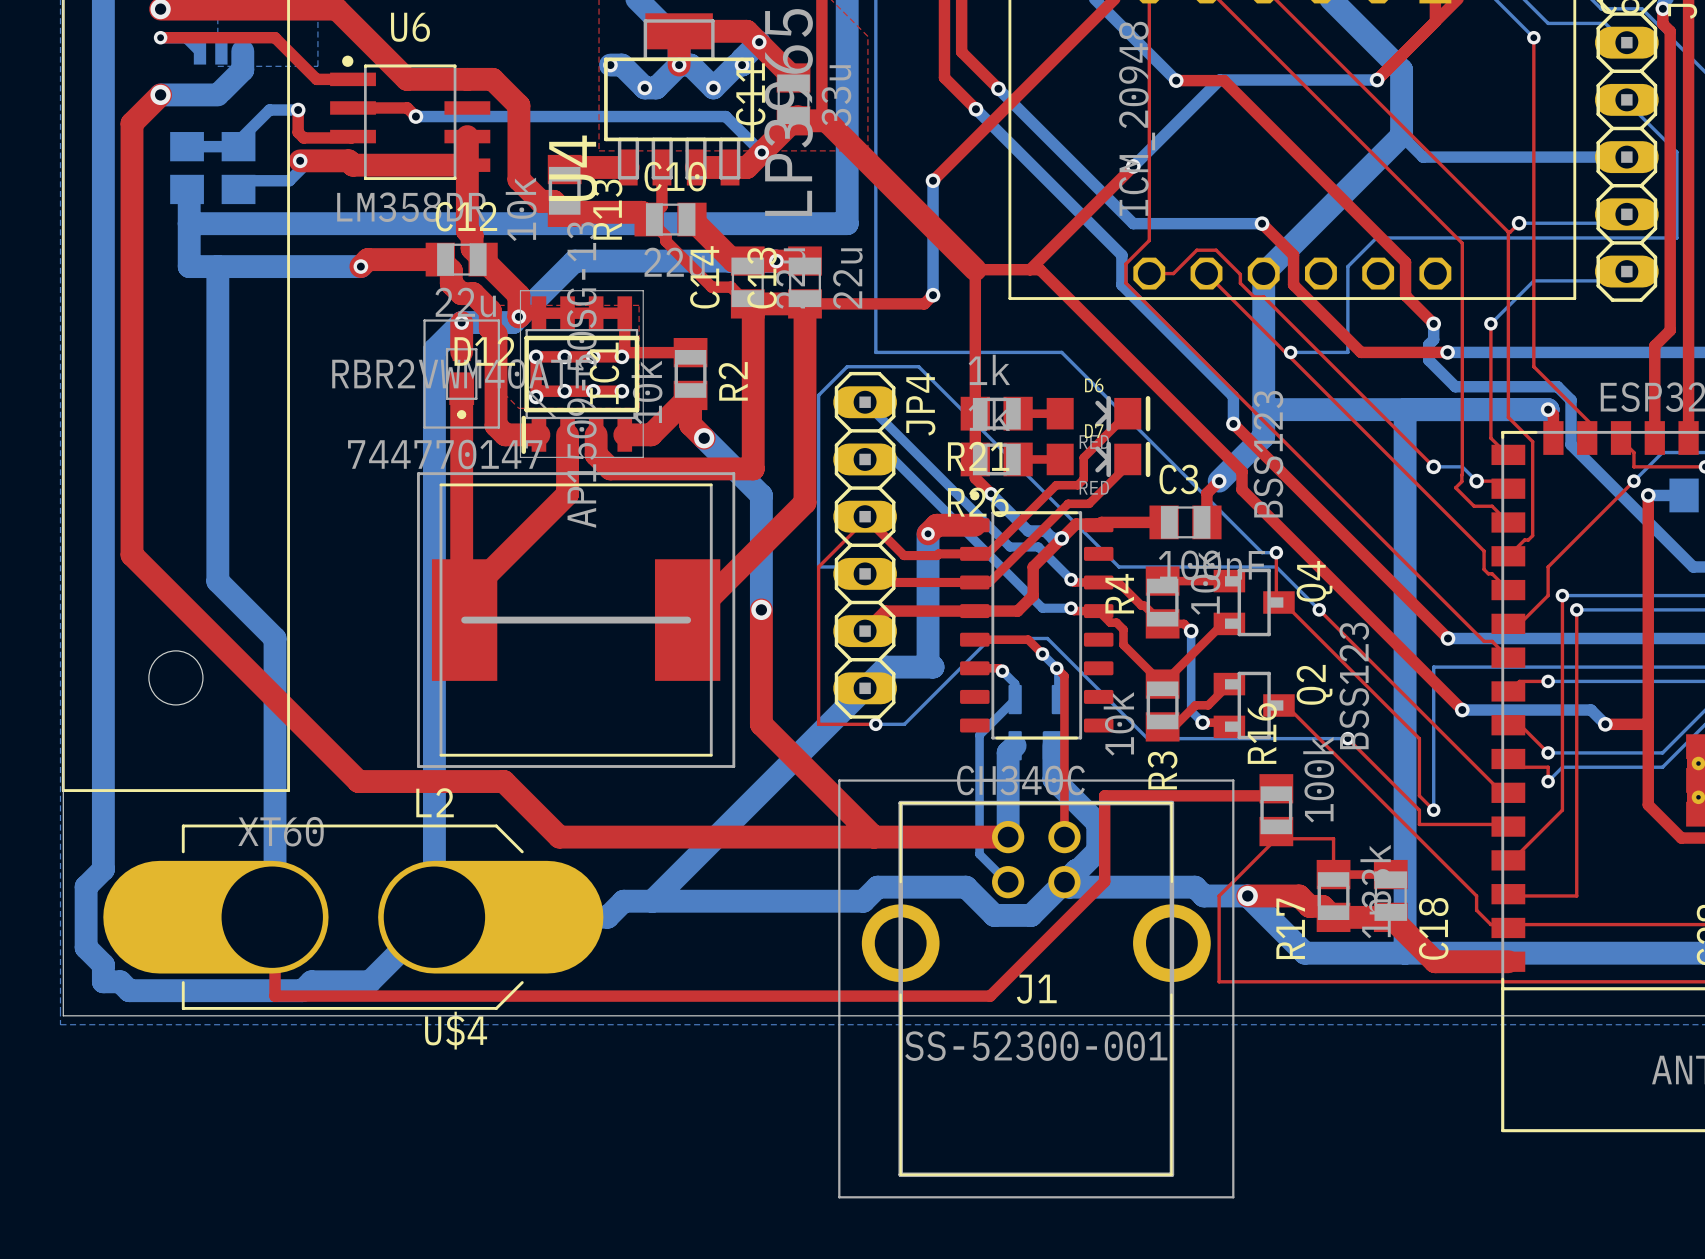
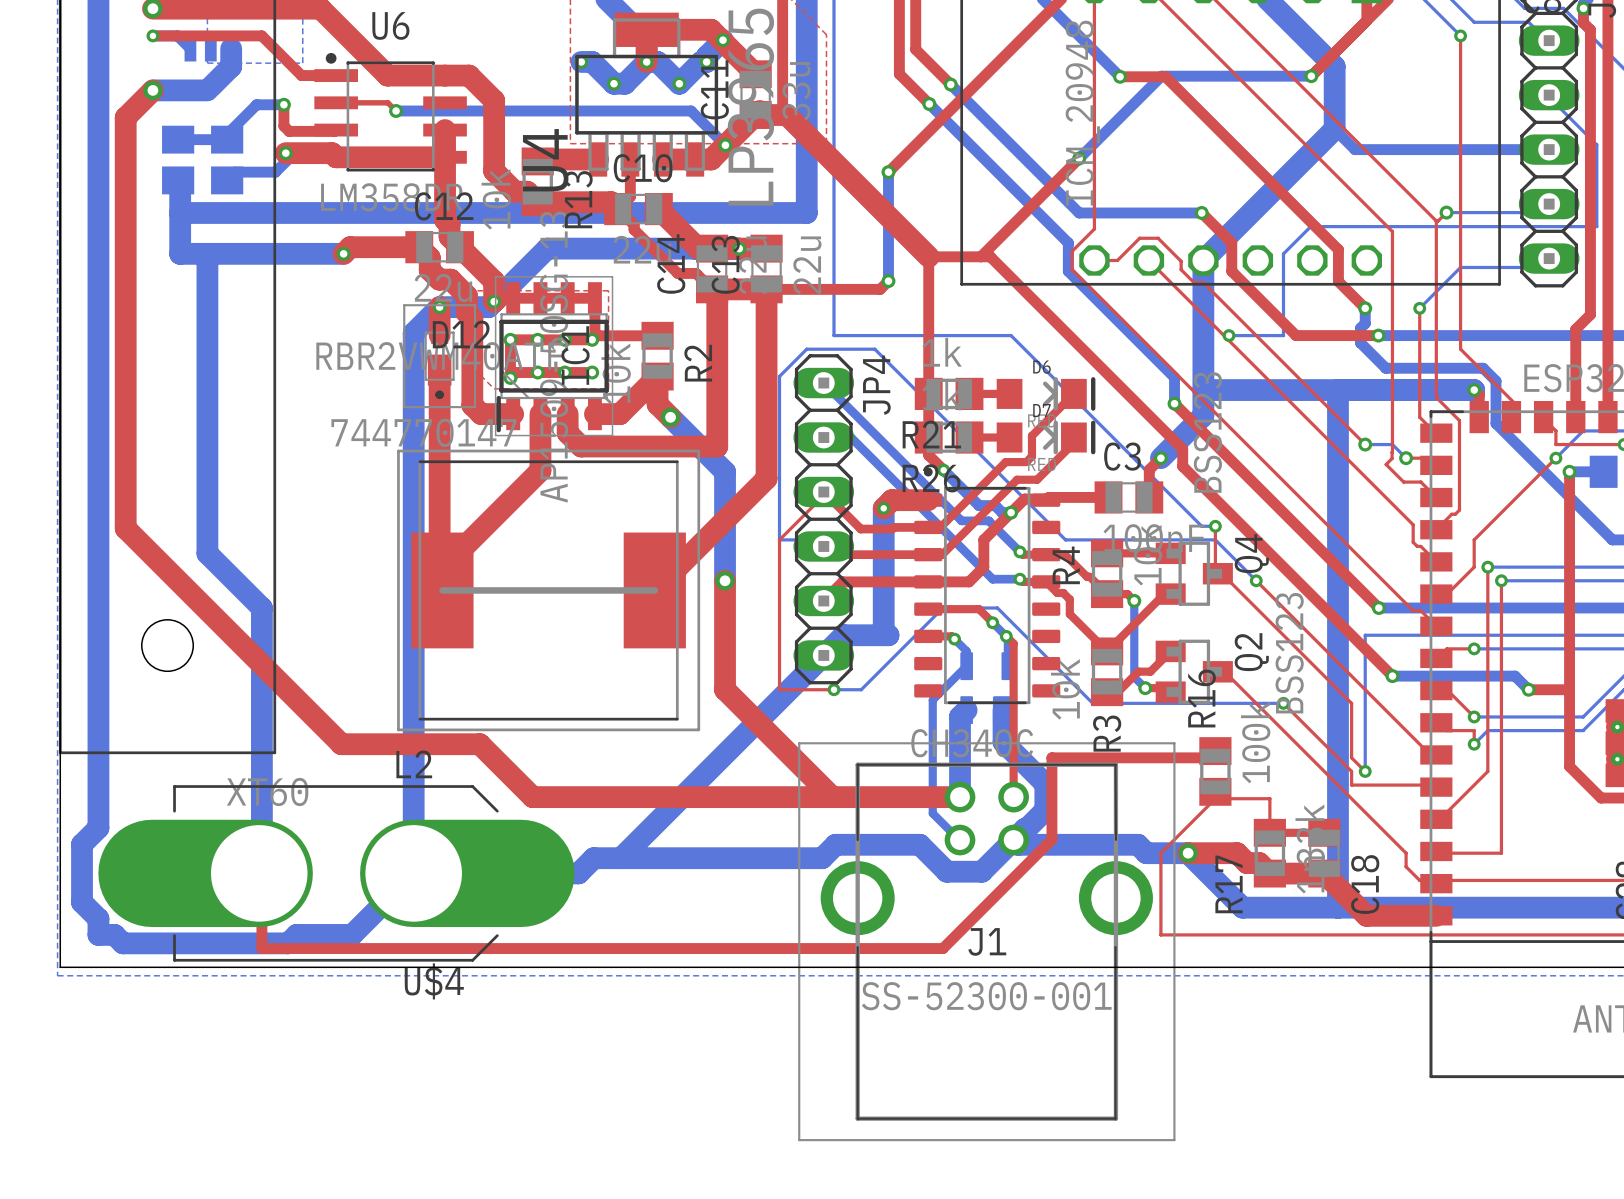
top track width: thick (353, 107) (407, 107) (415, 116) -> thin (336, 102) (387, 102) (396, 110)

